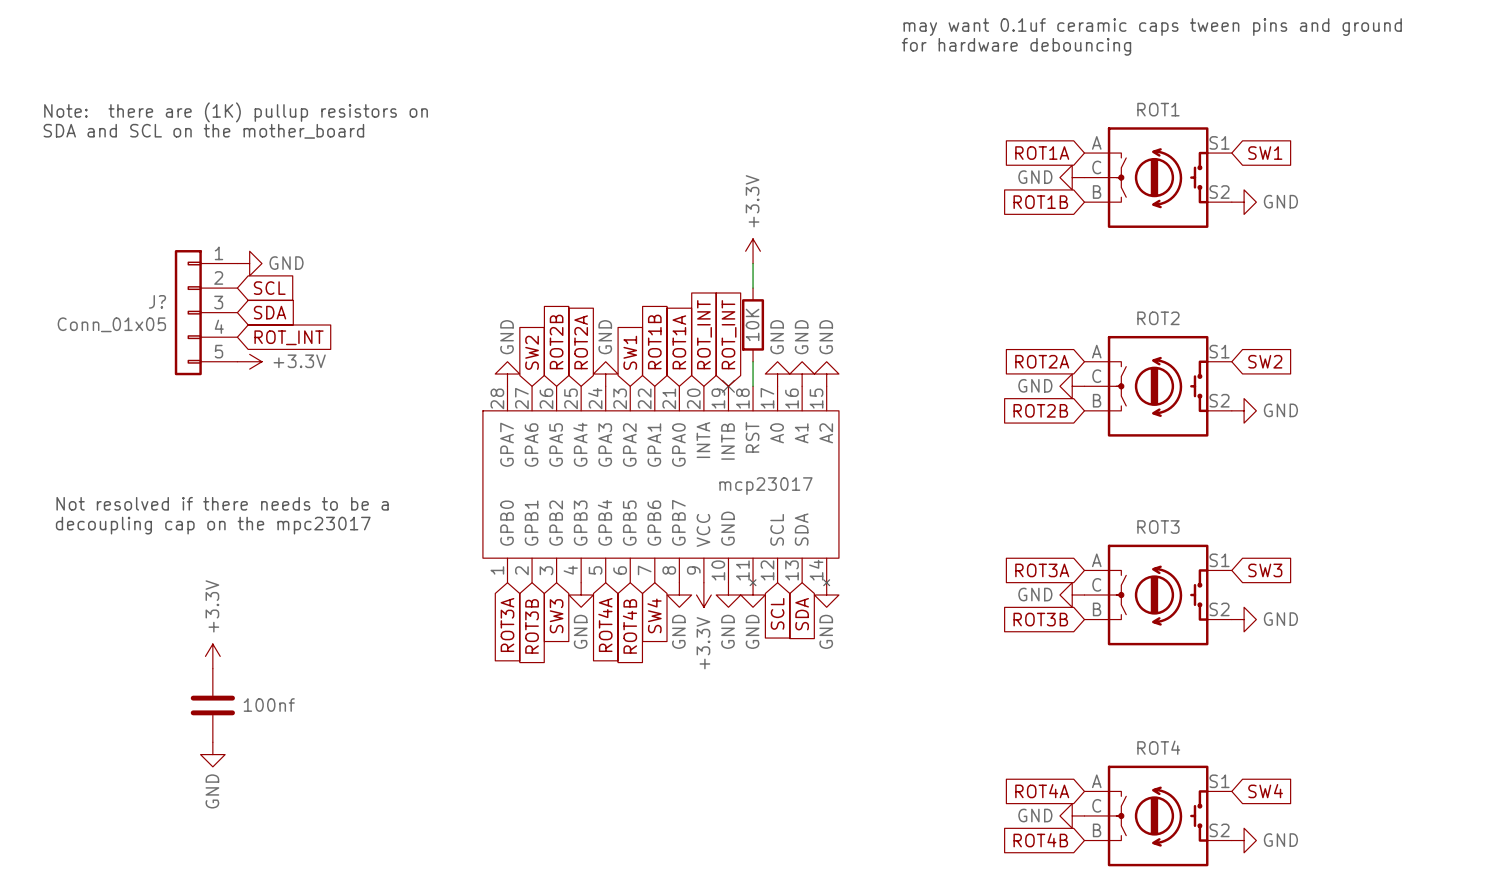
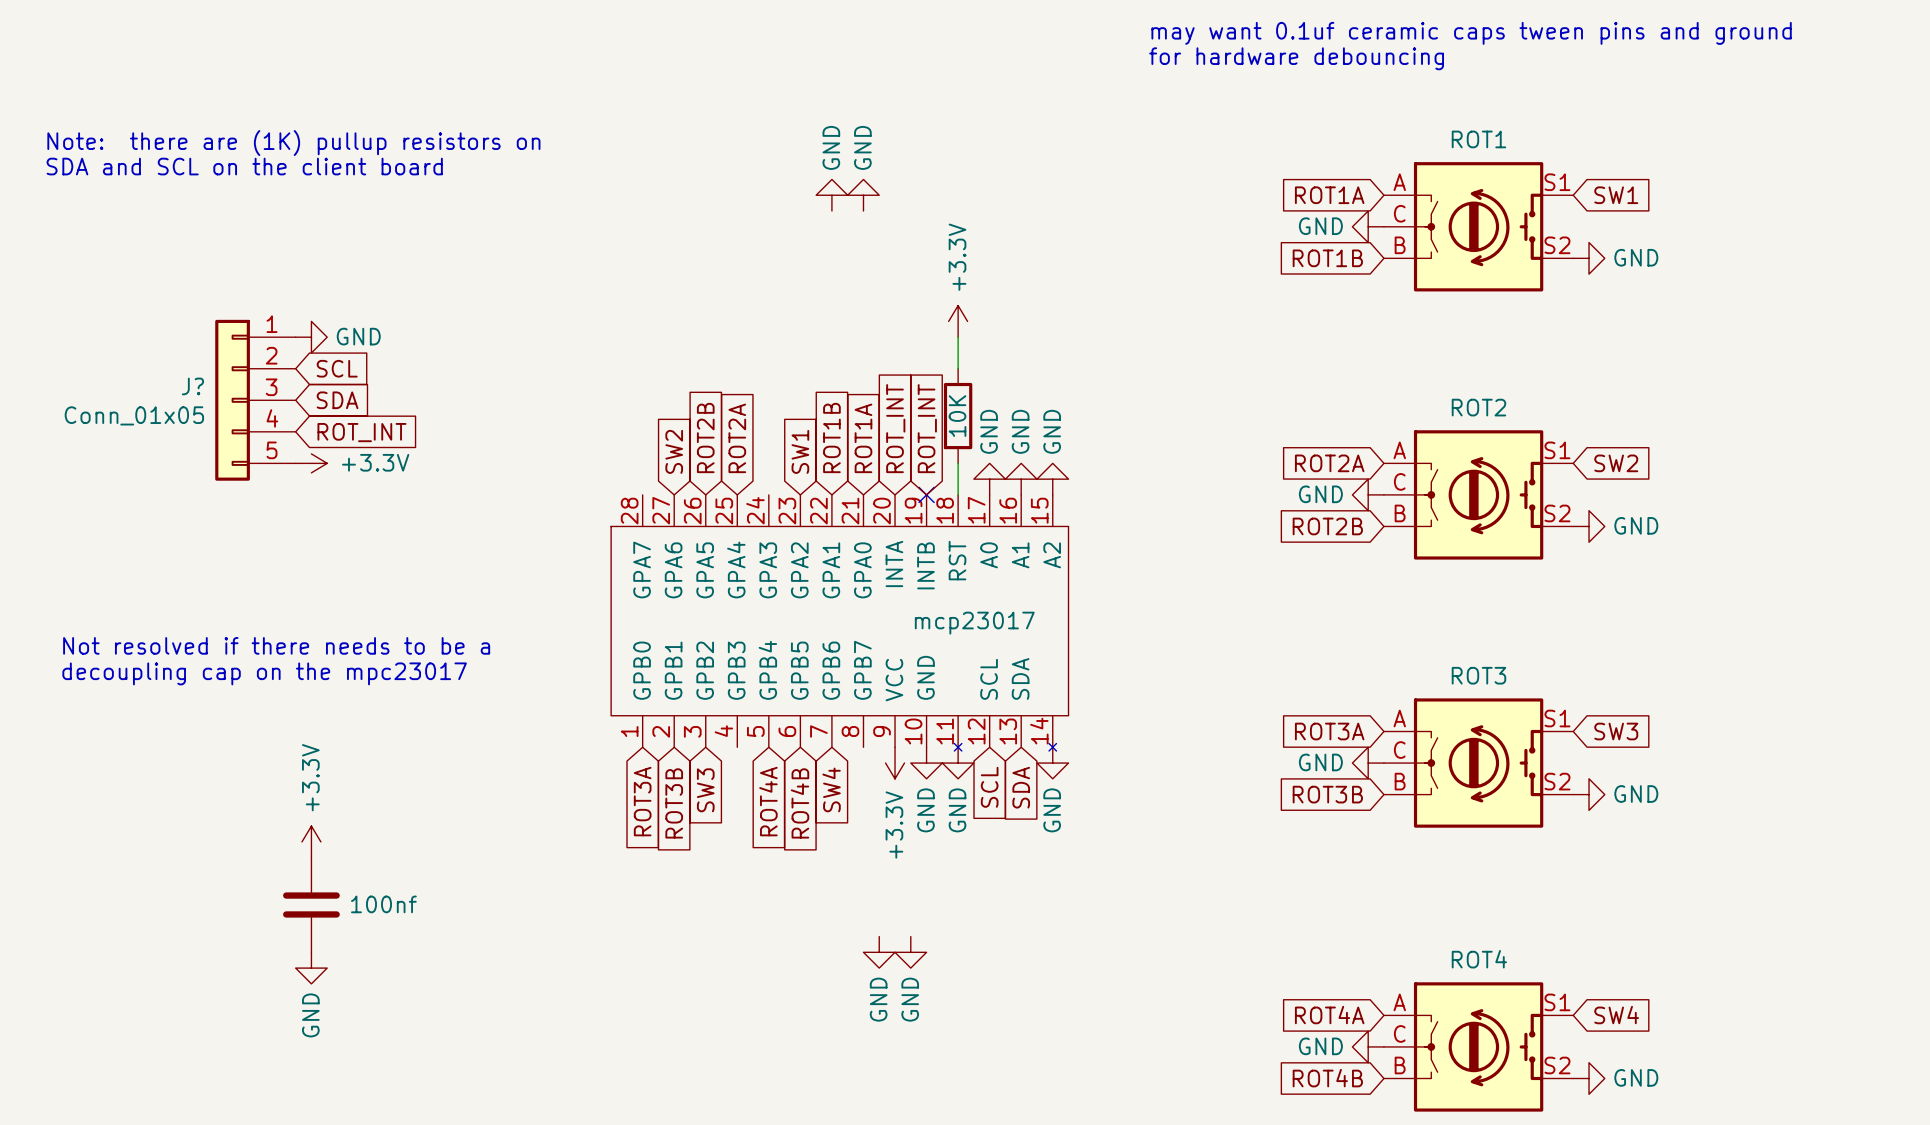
text: SDA and SCL on the mother_board (203, 131) -> SDA and SCL on the client board (244, 166)
power symbol: none -> GND (831, 195)
power symbol: none -> GND (863, 195)
power symbol: GND (507, 374) -> none
power symbol: GND (605, 374) -> none
power symbol: GND (581, 595) -> none
power symbol: GND (679, 595) -> none
power symbol position: +3.3V (212, 656) -> +3.3V (311, 841)
part position: (212, 705) -> (311, 905)
power symbol: none -> GND (879, 952)
power symbol: none -> GND (910, 952)
power symbol position: GND (212, 754) -> GND (311, 968)

